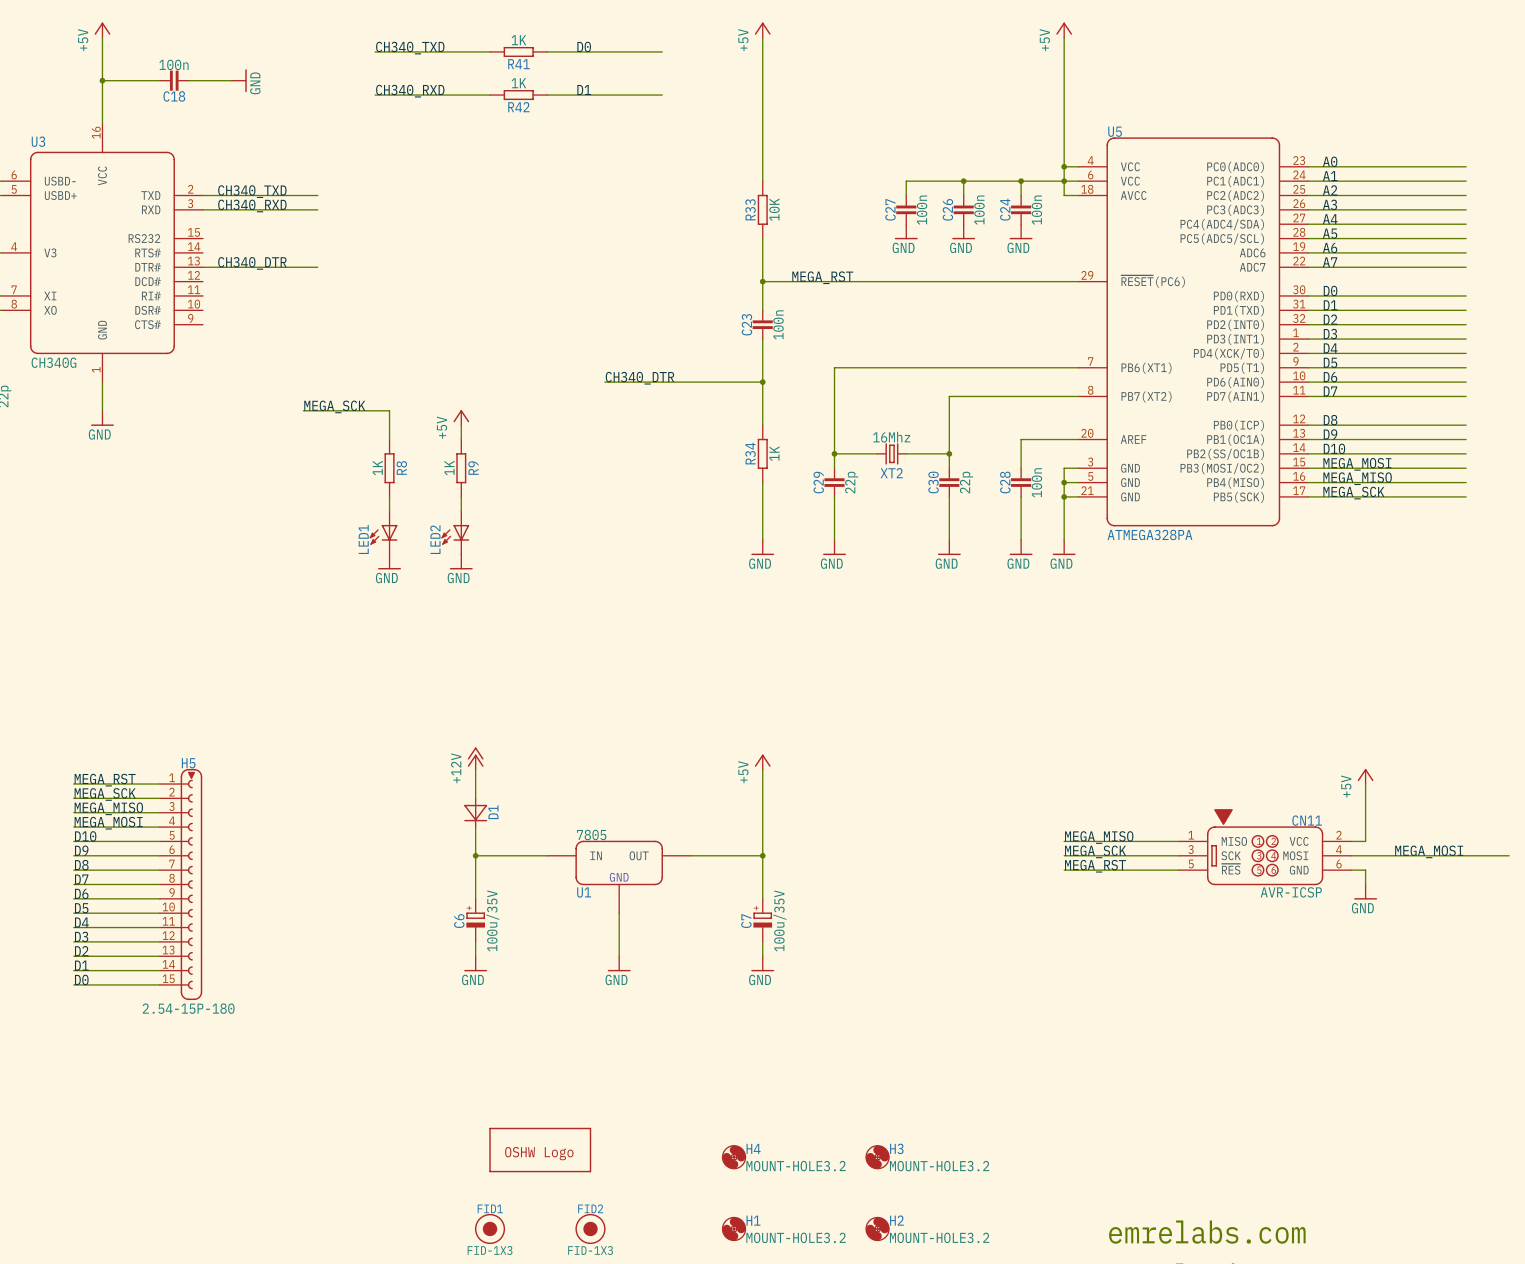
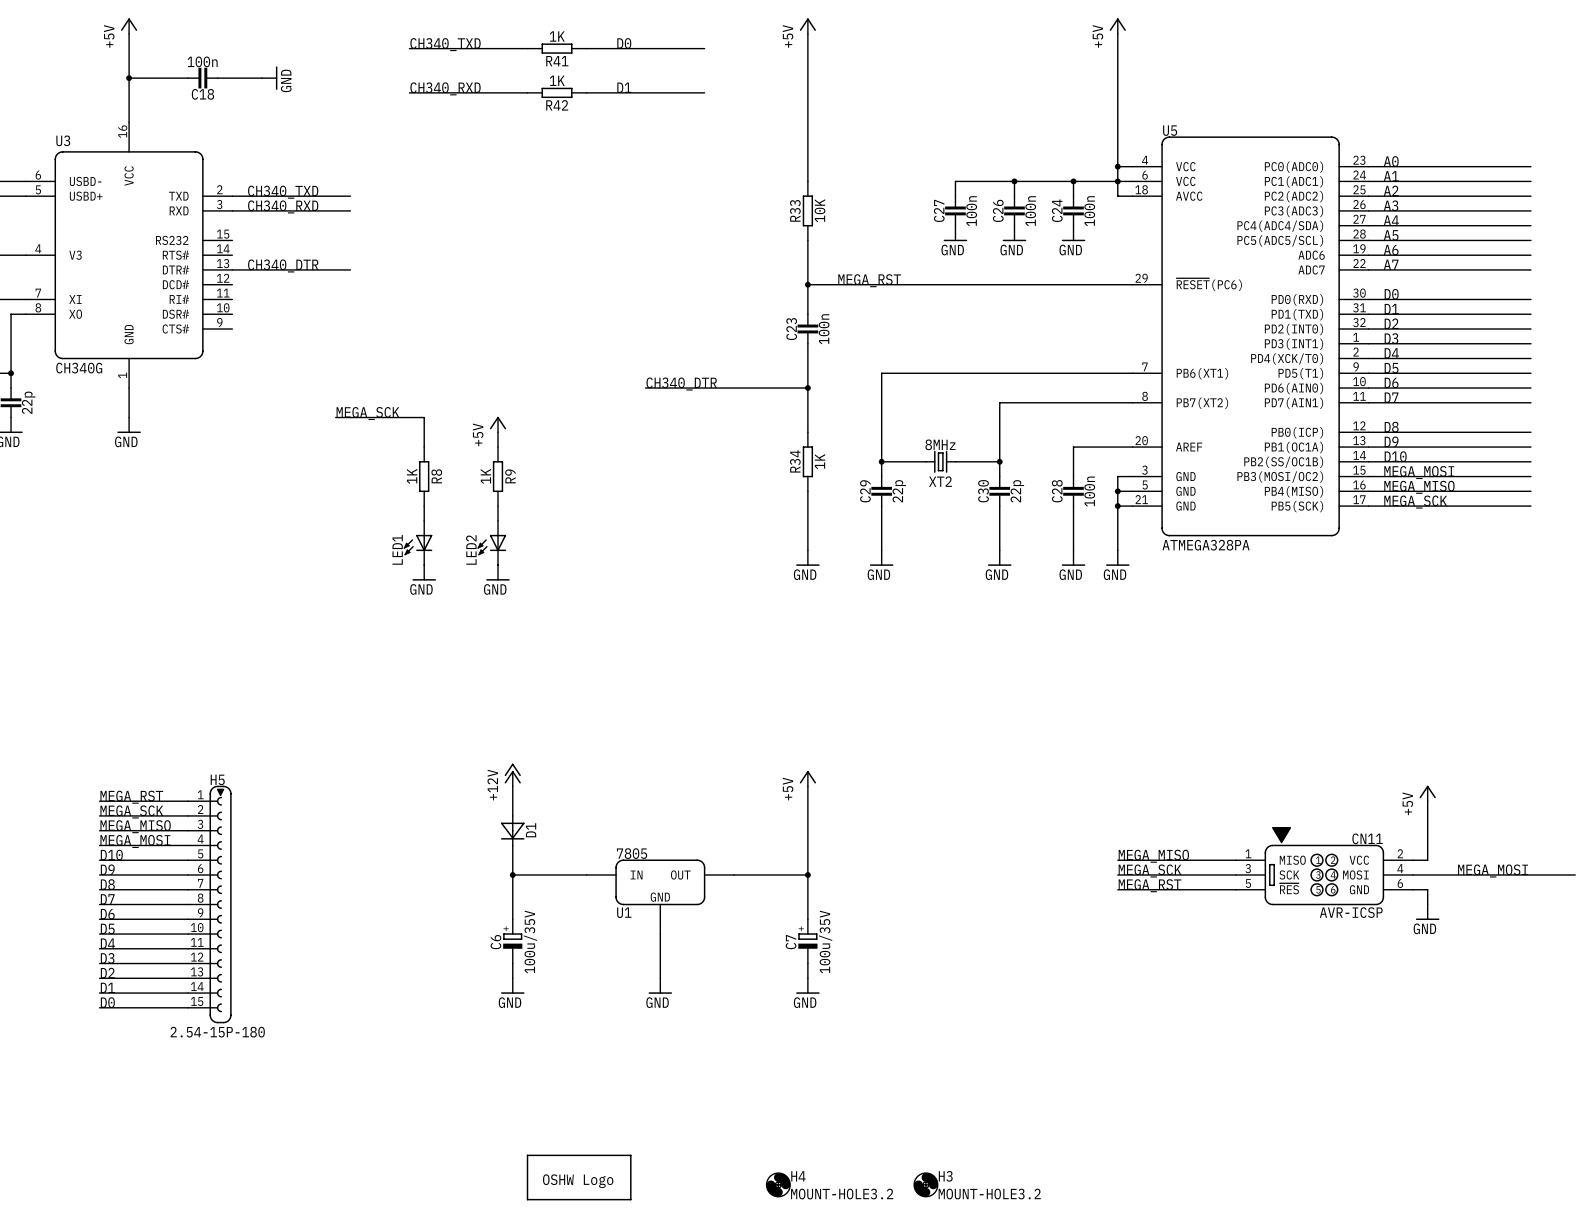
XT2 value: 16Mhz (891, 437) -> 8MHz (940, 444)

